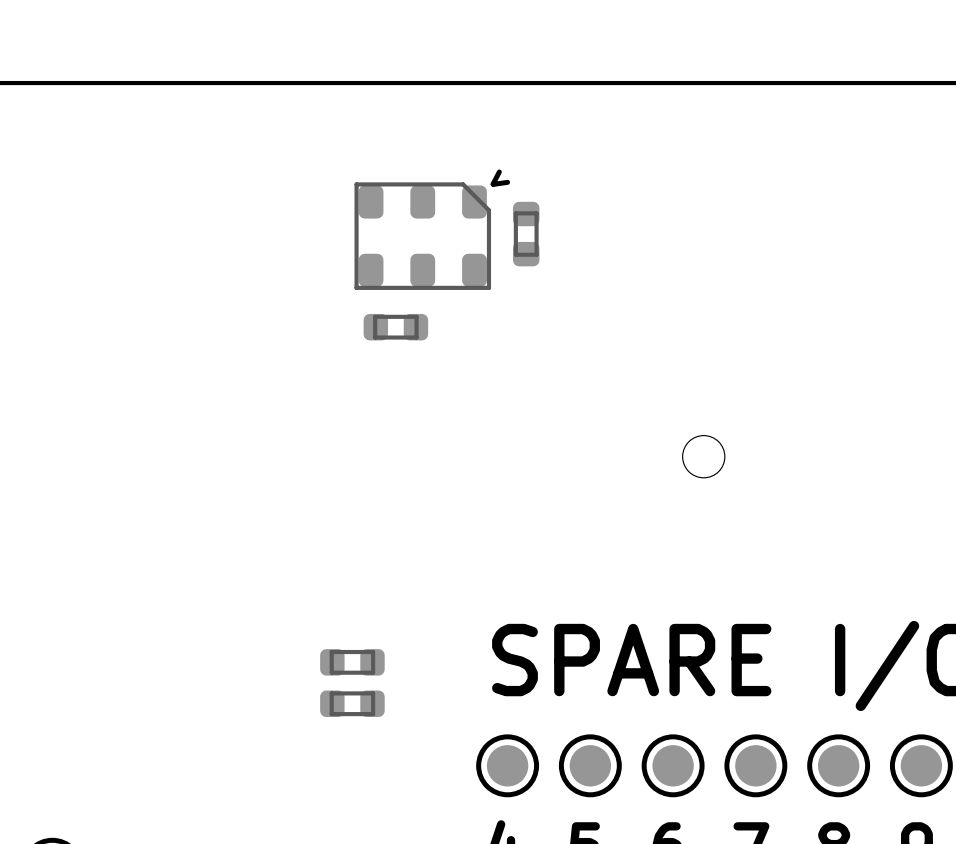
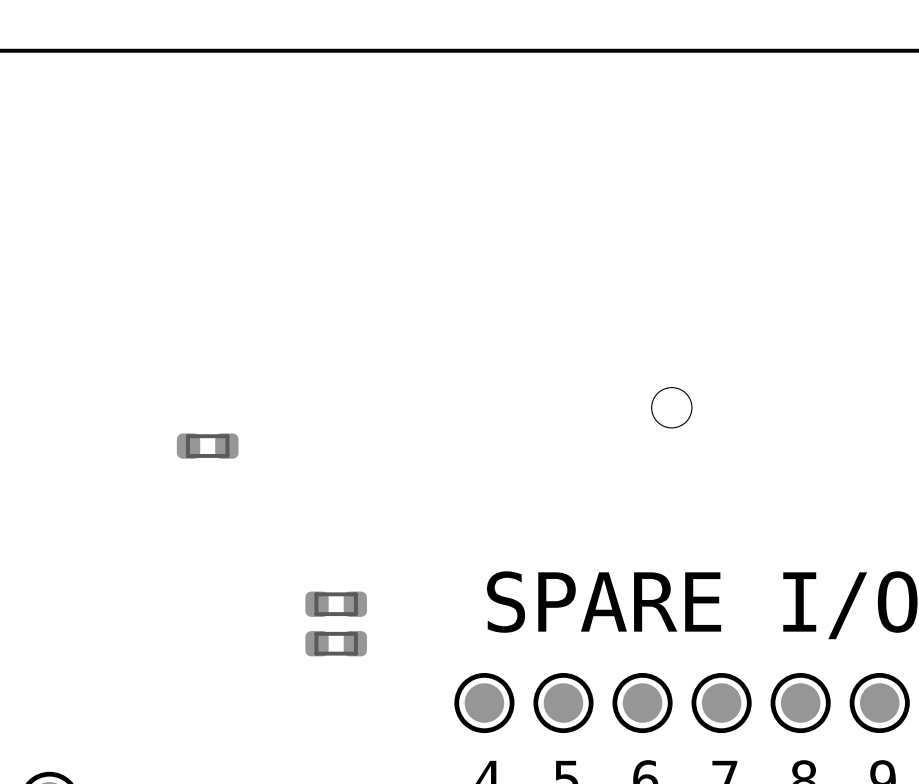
part: (432, 229) -> none
part: (526, 234) -> none
part: (395, 327) -> none
part: none -> (207, 446)

